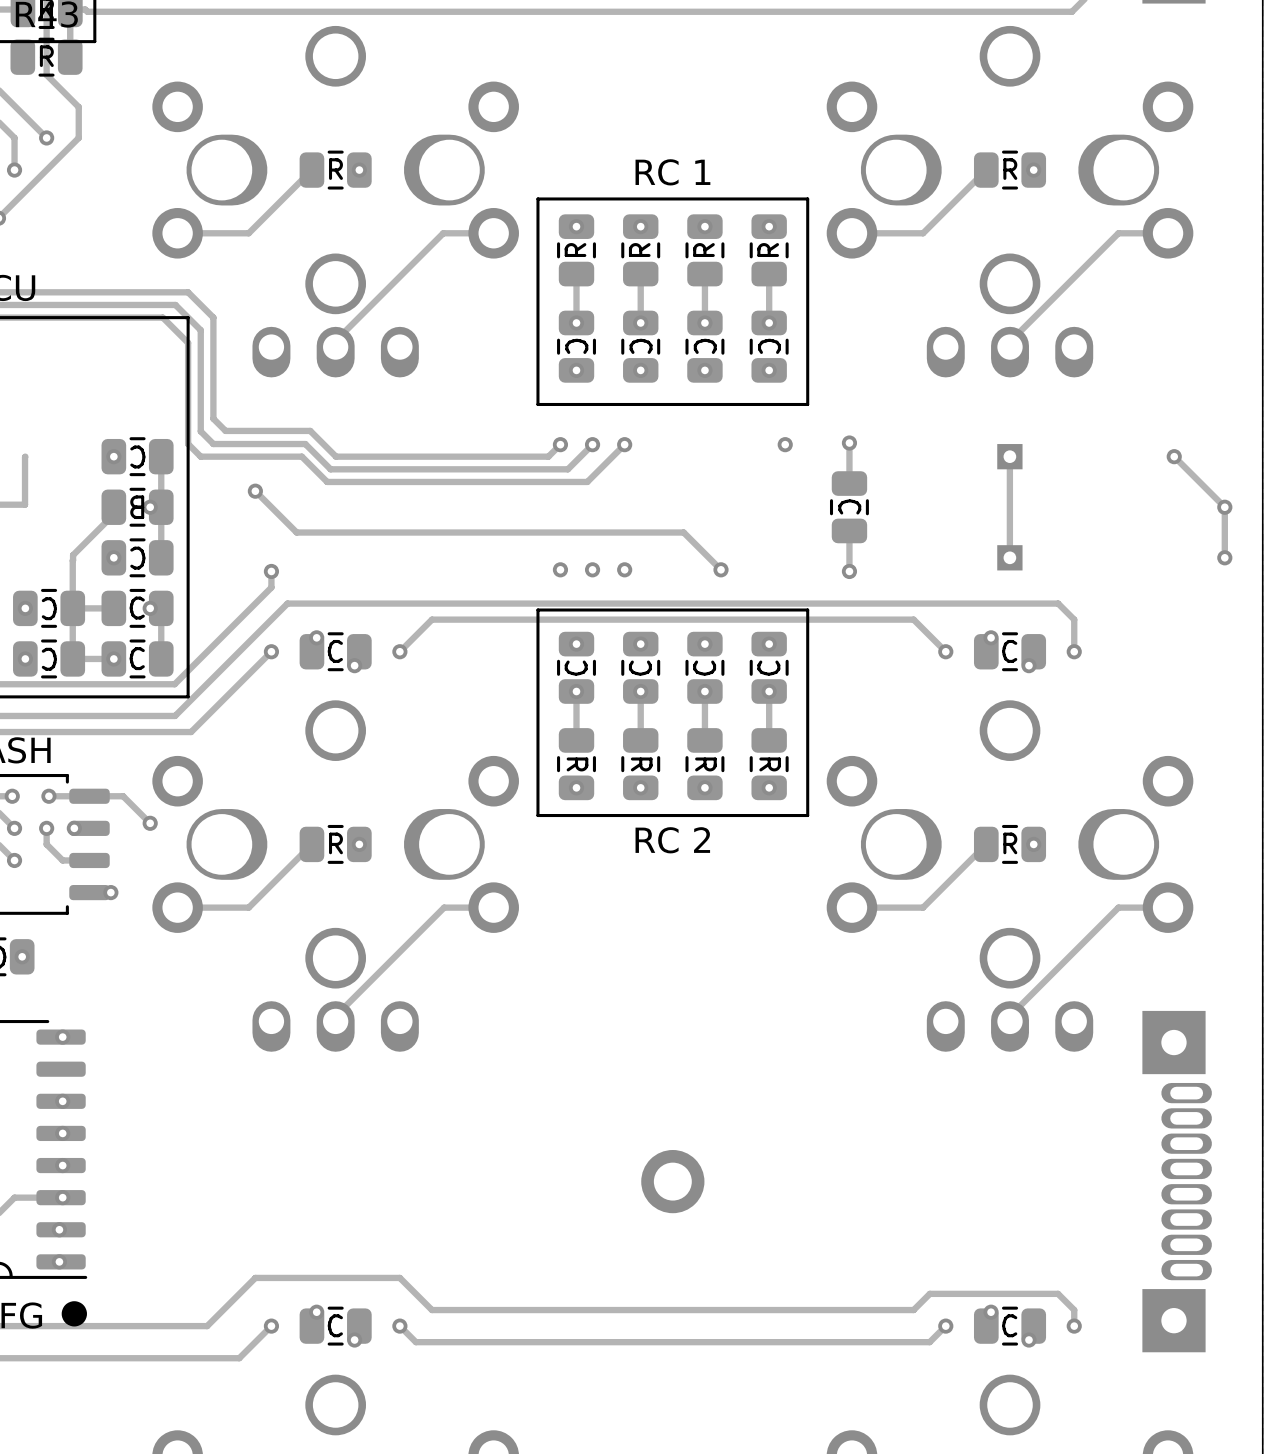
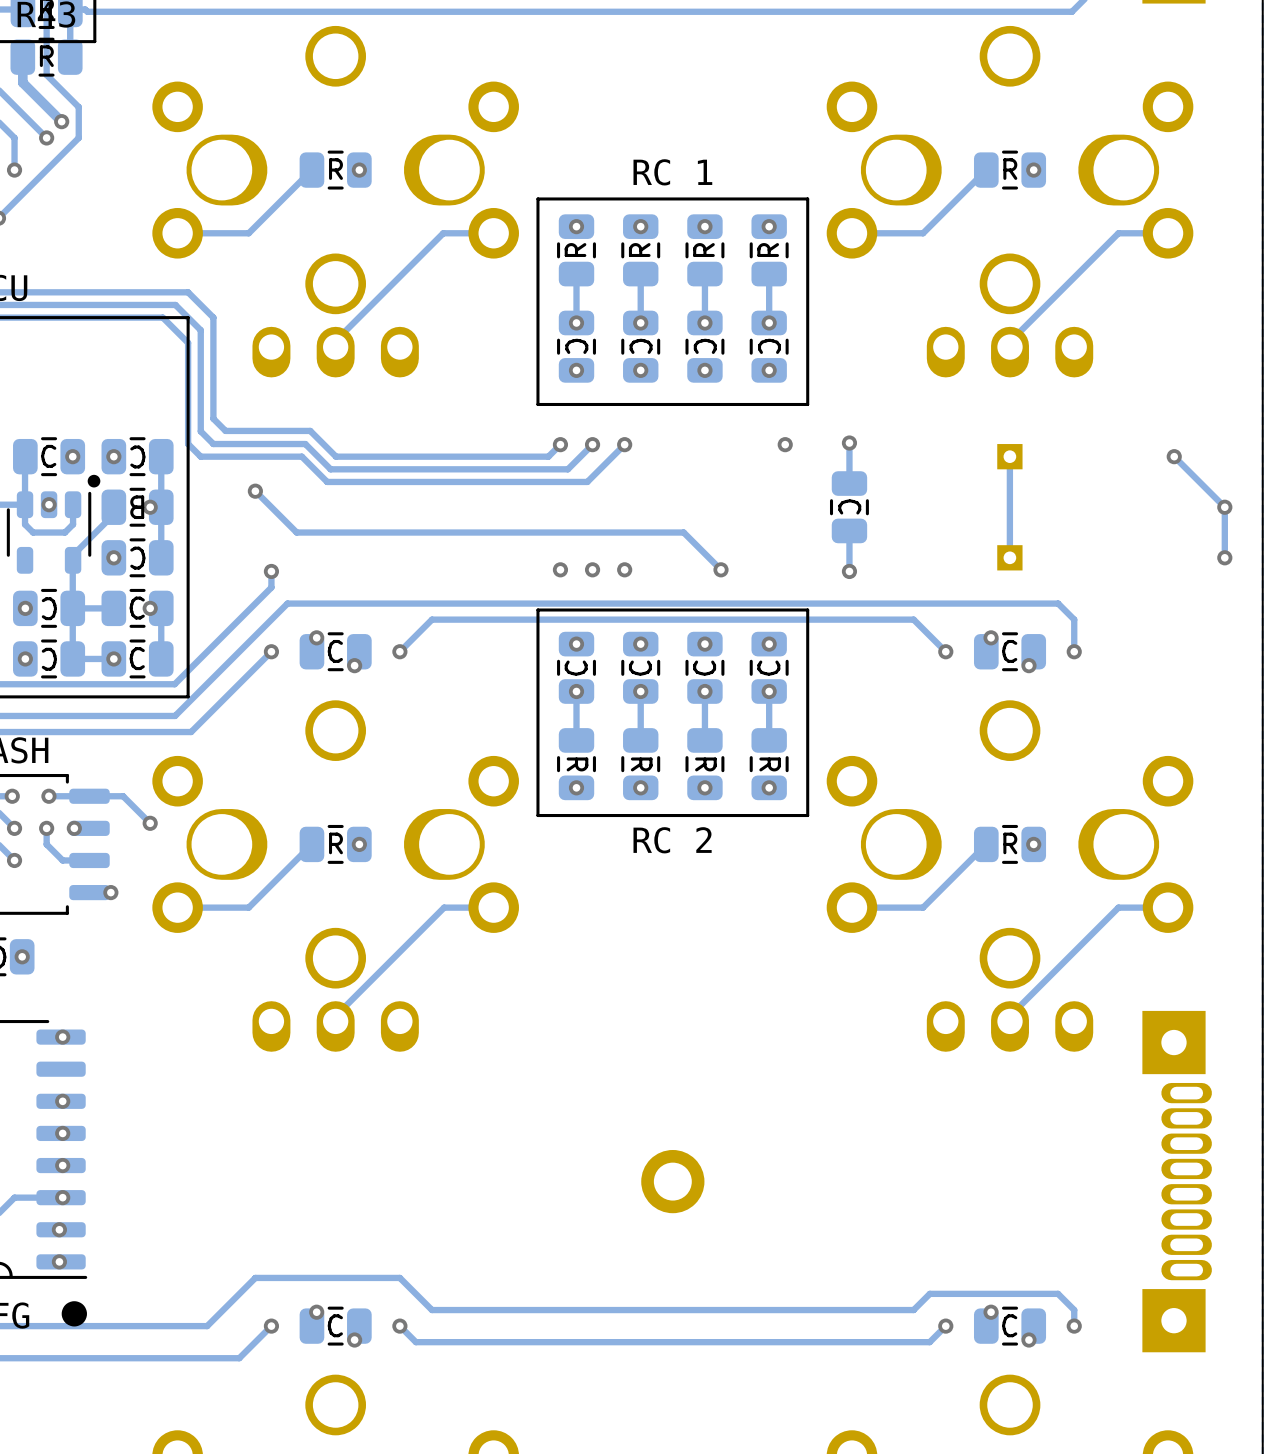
track: none -> (22, 57) (22, 82) (61, 121)
via: none -> (61, 121)
part: none -> (49, 456)
via: none -> (72, 456)
via: none -> (49, 504)
track: none -> (73, 504) (73, 524) (64, 532) (33, 532) (25, 524) (25, 504)
part: none -> (53, 524)

